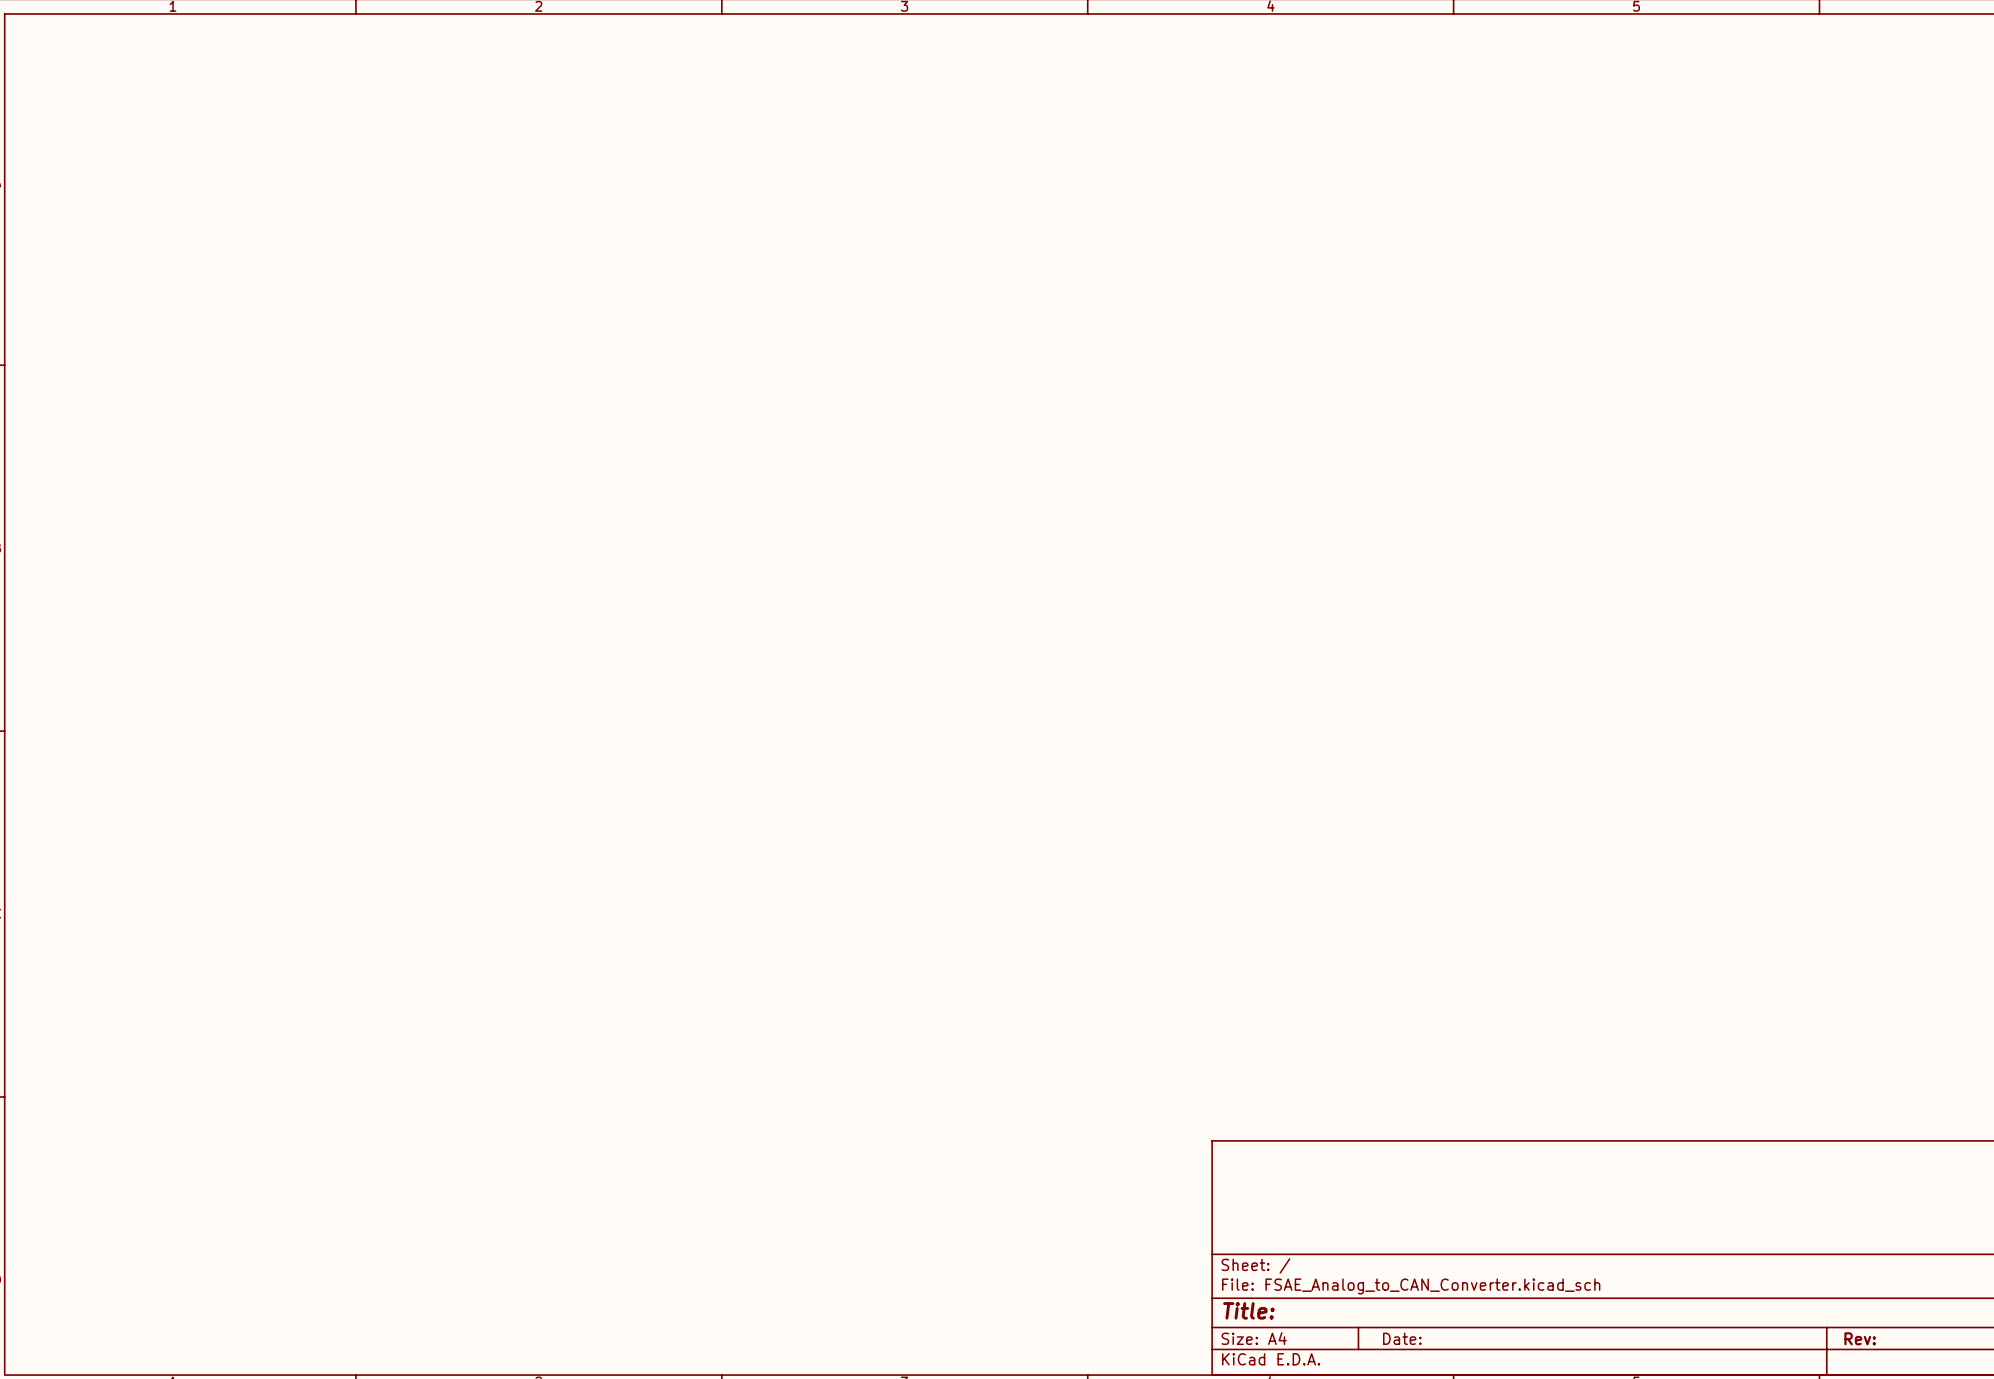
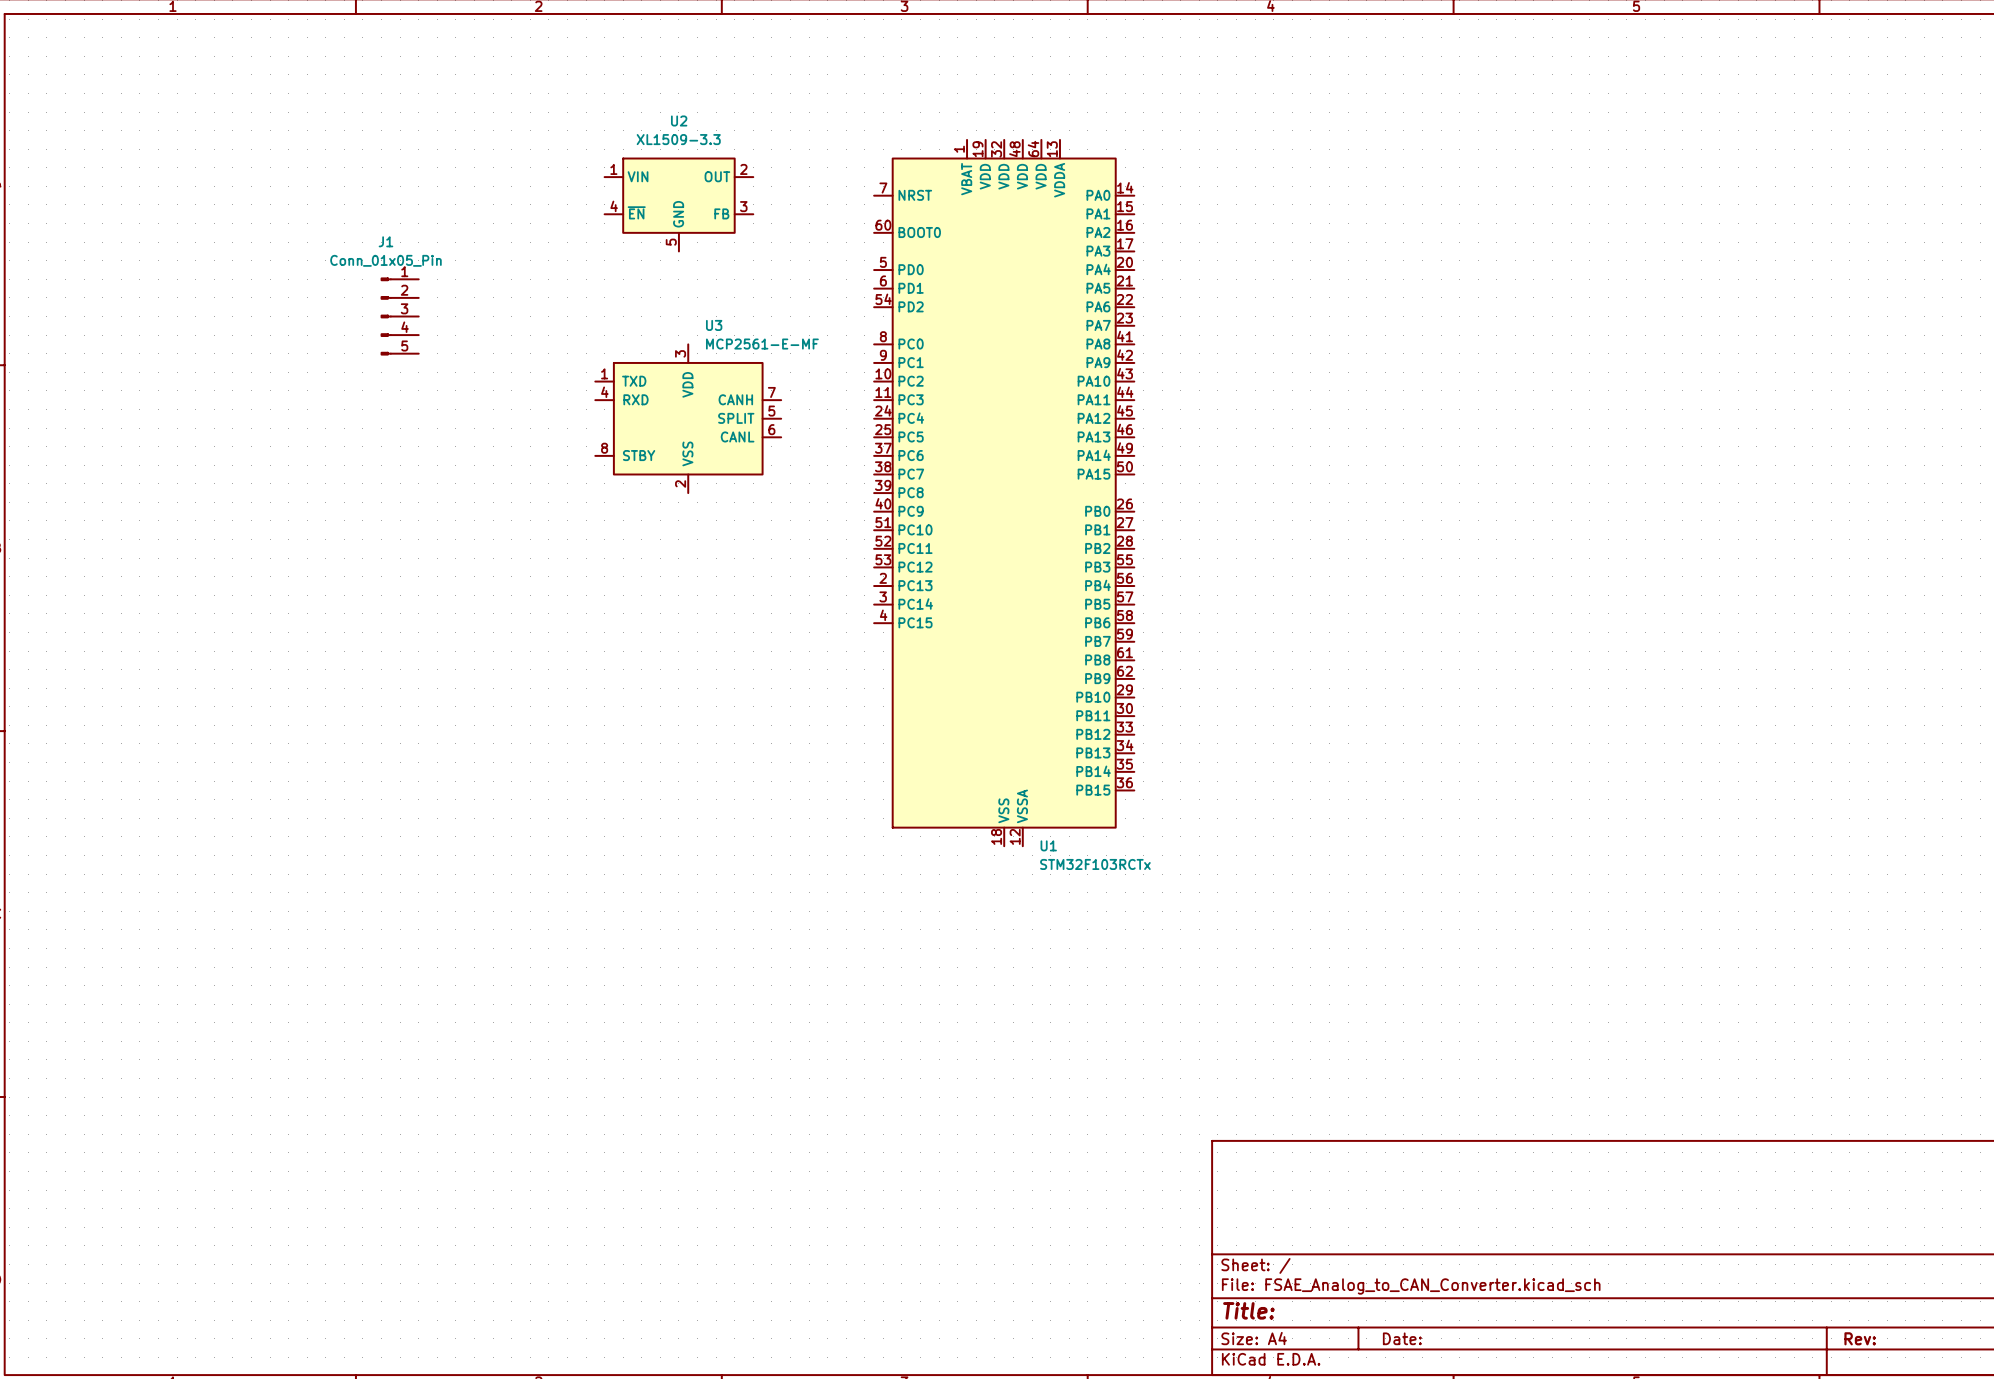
U2: none -> XL1509-3.3 (678, 204)
J1: none -> Conn_01x05_Pin (399, 316)
U3: none -> MCP2561-E-MF (688, 418)
U1: none -> STM32F103RCTx (1004, 493)

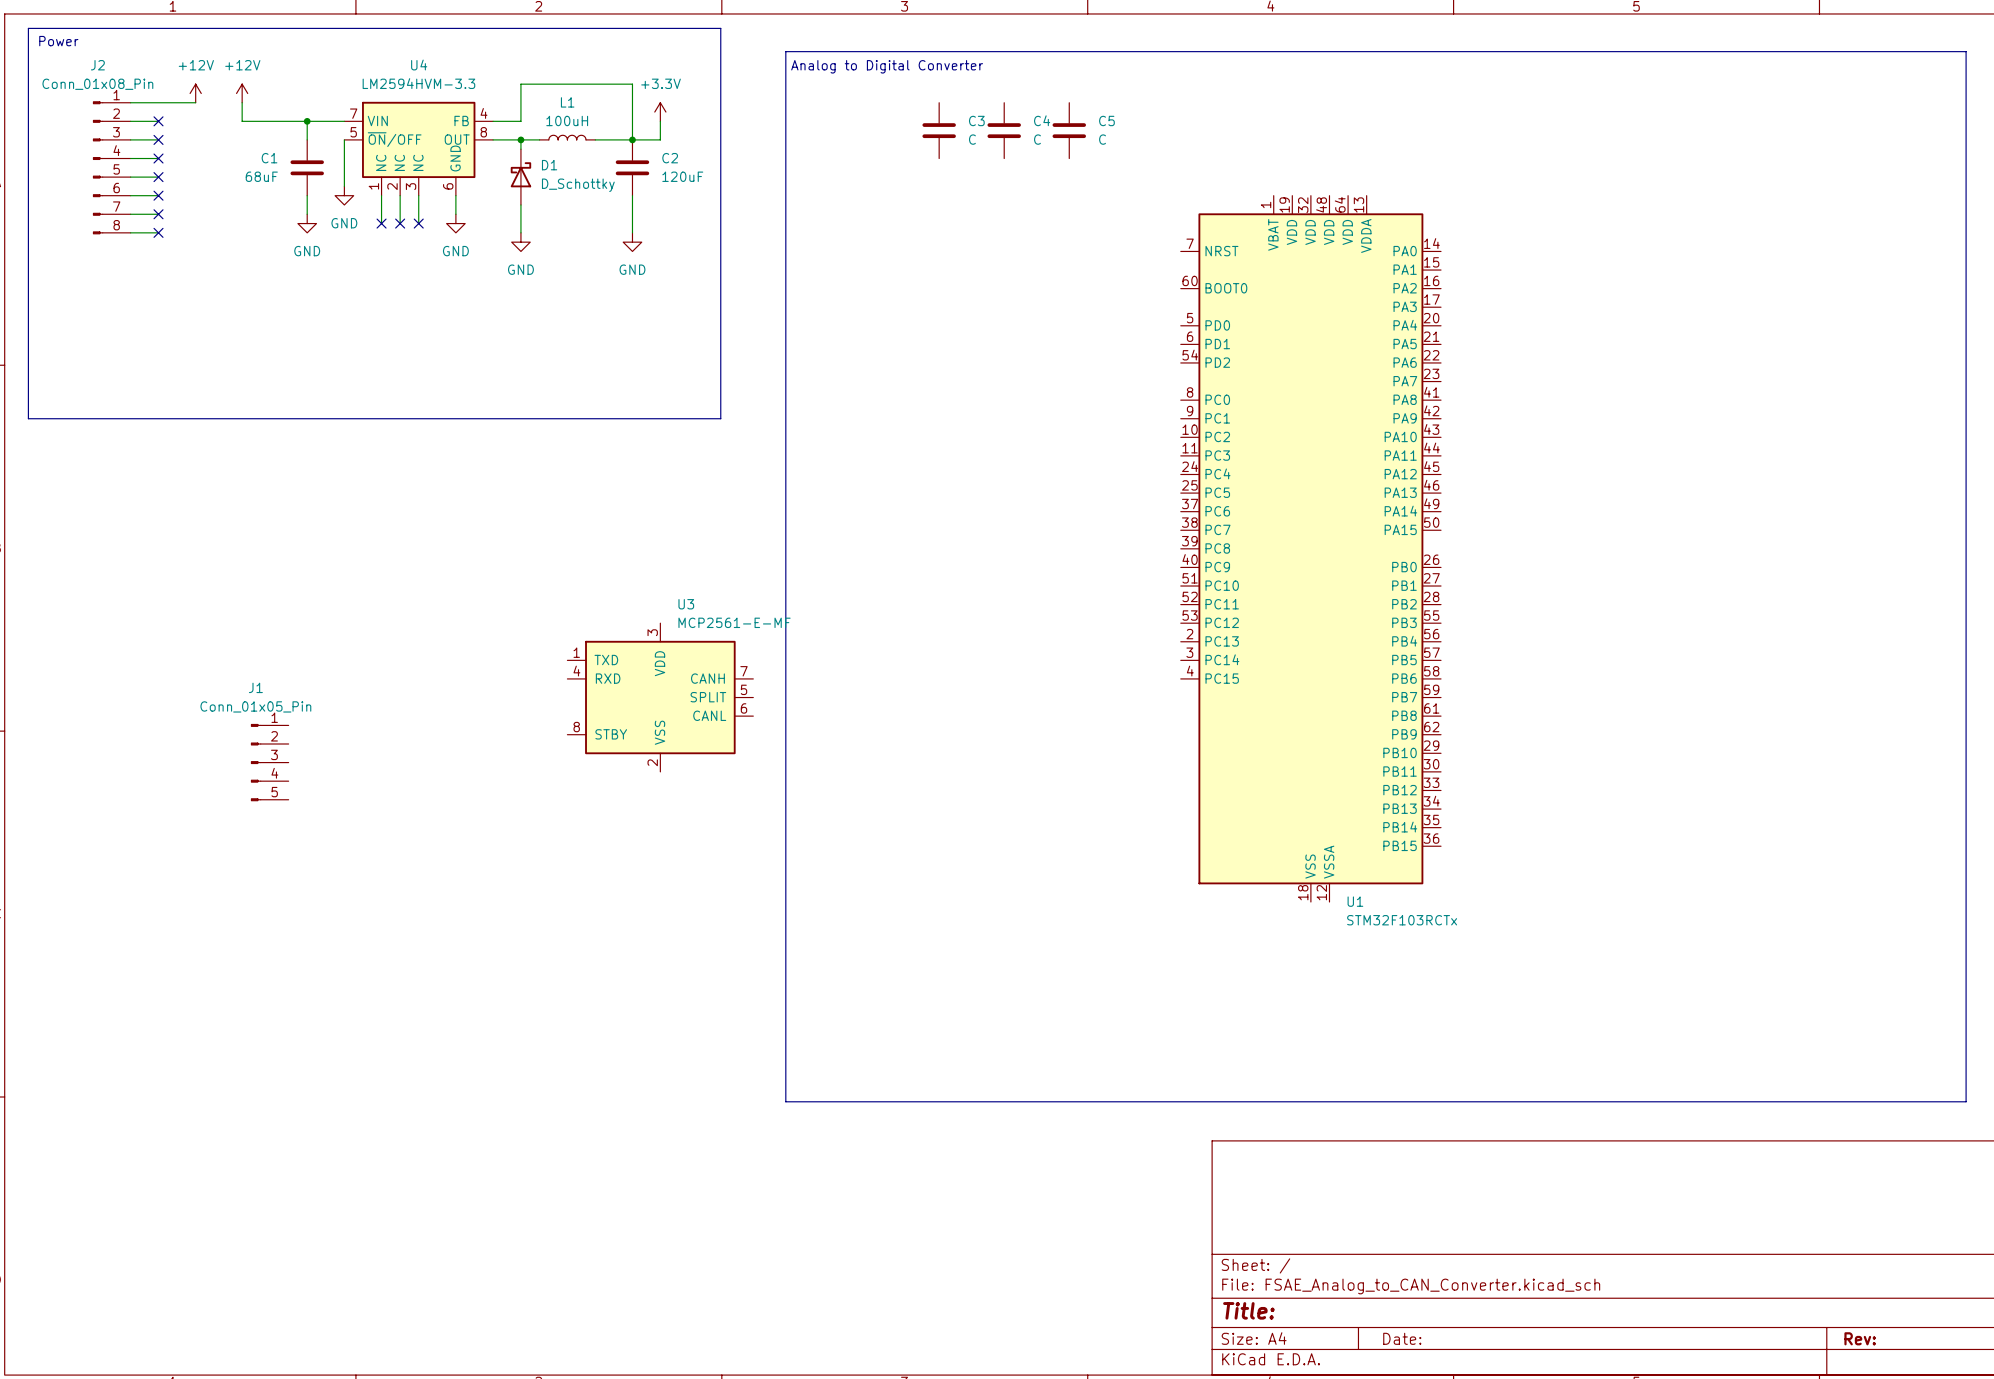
line: none -> (28, 28) (720, 28) (720, 418) (28, 418) (28, 28)
text: none -> Power (58, 41)
line: none -> (785, 51) (1966, 51) (1966, 1101) (785, 1101) (785, 51)
text: none -> Analog to Digital Converter (887, 66)
power symbol: none -> +12V (195, 93)
power symbol: none -> +12V (242, 93)
wire: none -> (130, 102) (195, 102)
wire: none -> (242, 102) (242, 121) (344, 121)
power symbol: none -> +3.3V (660, 112)
wire: none -> (130, 121) (158, 121)
no-connect mark: none -> (158, 121)
wire: none -> (307, 121) (307, 139)
junction: none -> (307, 121)
wire: none -> (493, 121) (520, 121) (520, 84) (632, 84) (632, 139)
wire: none -> (660, 121) (660, 139) (595, 139)
C3: none -> C (939, 130)
C4: none -> C (1004, 130)
C5: none -> C (1069, 130)
L1: none -> 100uH (567, 137)
wire: none -> (130, 139) (158, 139)
no-connect mark: none -> (158, 139)
wire: none -> (344, 139) (344, 186)
wire: none -> (493, 139) (539, 139)
wire: none -> (520, 139) (520, 149)
junction: none -> (520, 139)
junction: none -> (632, 139)
U4: none -> LM2594HVM-3.3 (418, 148)
wire: none -> (130, 158) (158, 158)
no-connect mark: none -> (158, 158)
J2: none -> Conn_01x08_Pin (111, 167)
C1: none -> 68uF (307, 167)
C2: none -> 120uF (632, 167)
wire: none -> (130, 177) (158, 177)
no-connect mark: none -> (158, 177)
D1: none -> D_Schottky (520, 177)
wire: none -> (130, 195) (158, 195)
no-connect mark: none -> (158, 195)
wire: none -> (307, 195) (307, 214)
power symbol: none -> GND (344, 195)
wire: none -> (381, 195) (381, 223)
wire: none -> (400, 195) (400, 223)
wire: none -> (418, 195) (418, 223)
wire: none -> (455, 195) (455, 214)
wire: none -> (520, 204) (520, 232)
U2: XL1509-3.3 (678, 204) -> none
wire: none -> (130, 214) (158, 214)
no-connect mark: none -> (158, 214)
power symbol: none -> GND (307, 223)
no-connect mark: none -> (381, 223)
no-connect mark: none -> (400, 223)
no-connect mark: none -> (418, 223)
power symbol: none -> GND (455, 223)
wire: none -> (130, 232) (158, 232)
no-connect mark: none -> (158, 232)
power symbol: none -> GND (520, 242)
power symbol: none -> GND (632, 242)
J1 position: (399, 316) -> (269, 762)
U3 position: (688, 418) -> (660, 697)
U1 position: (1004, 493) -> (1310, 548)

